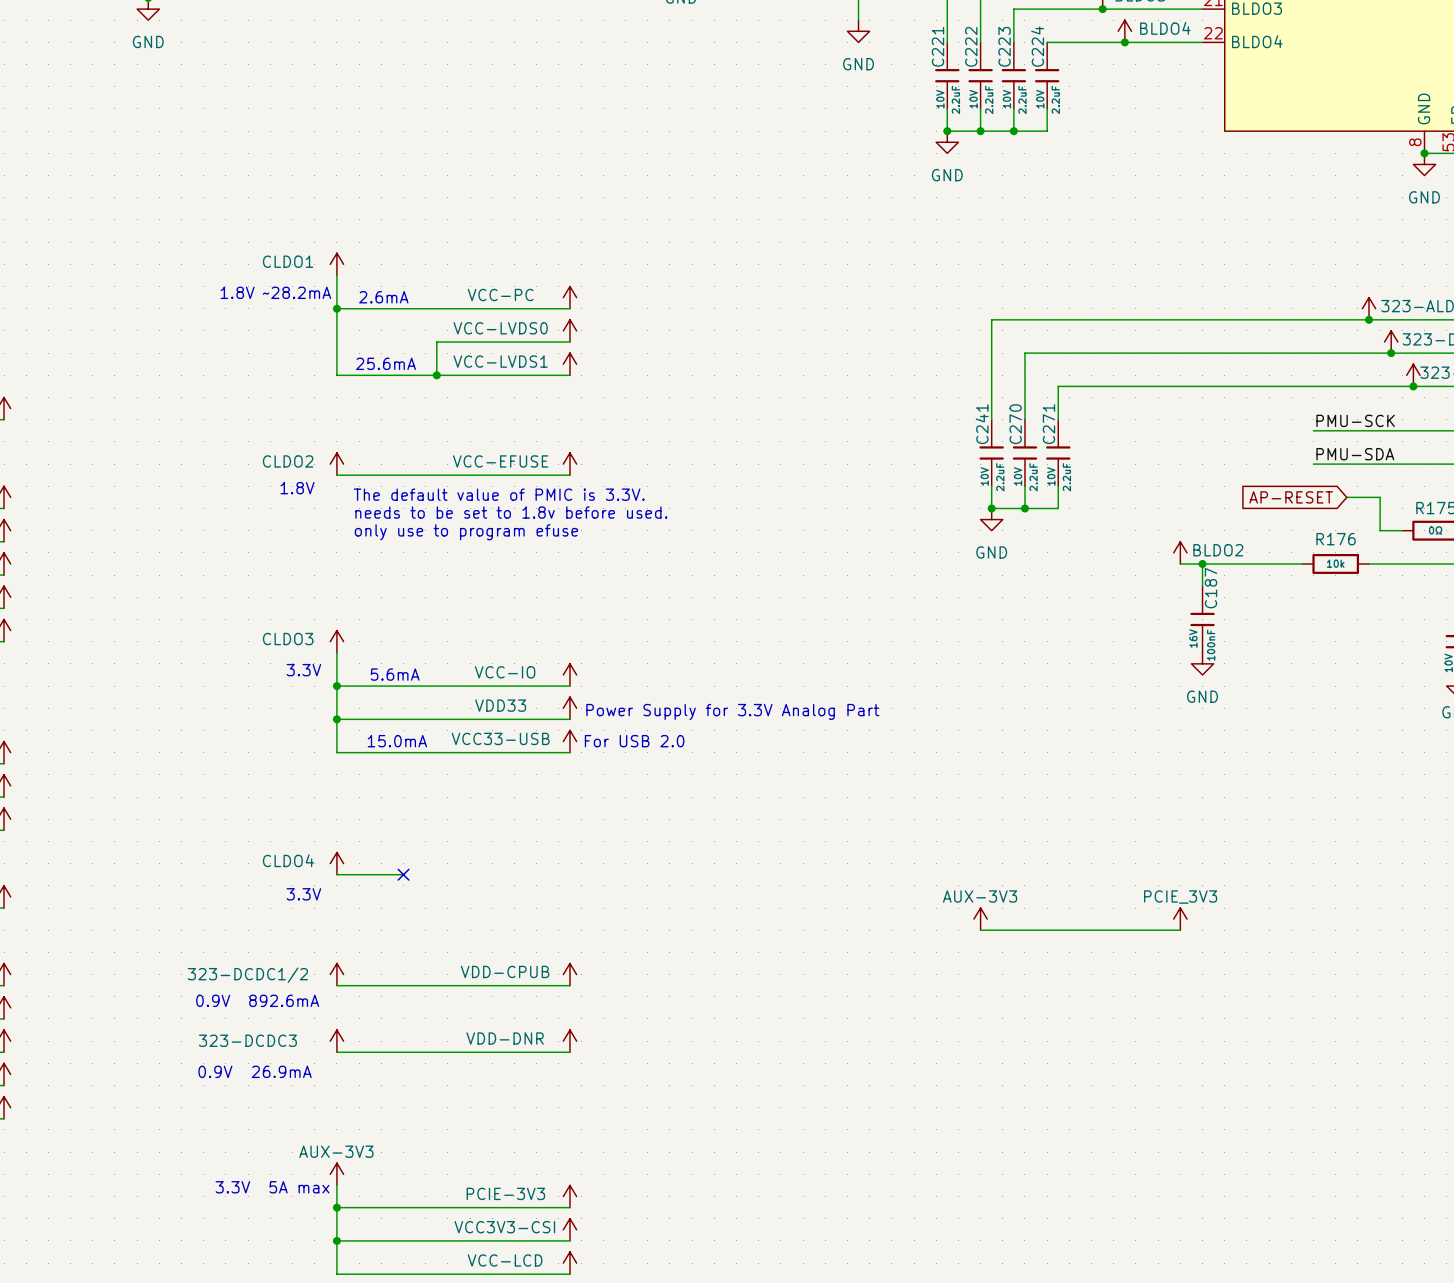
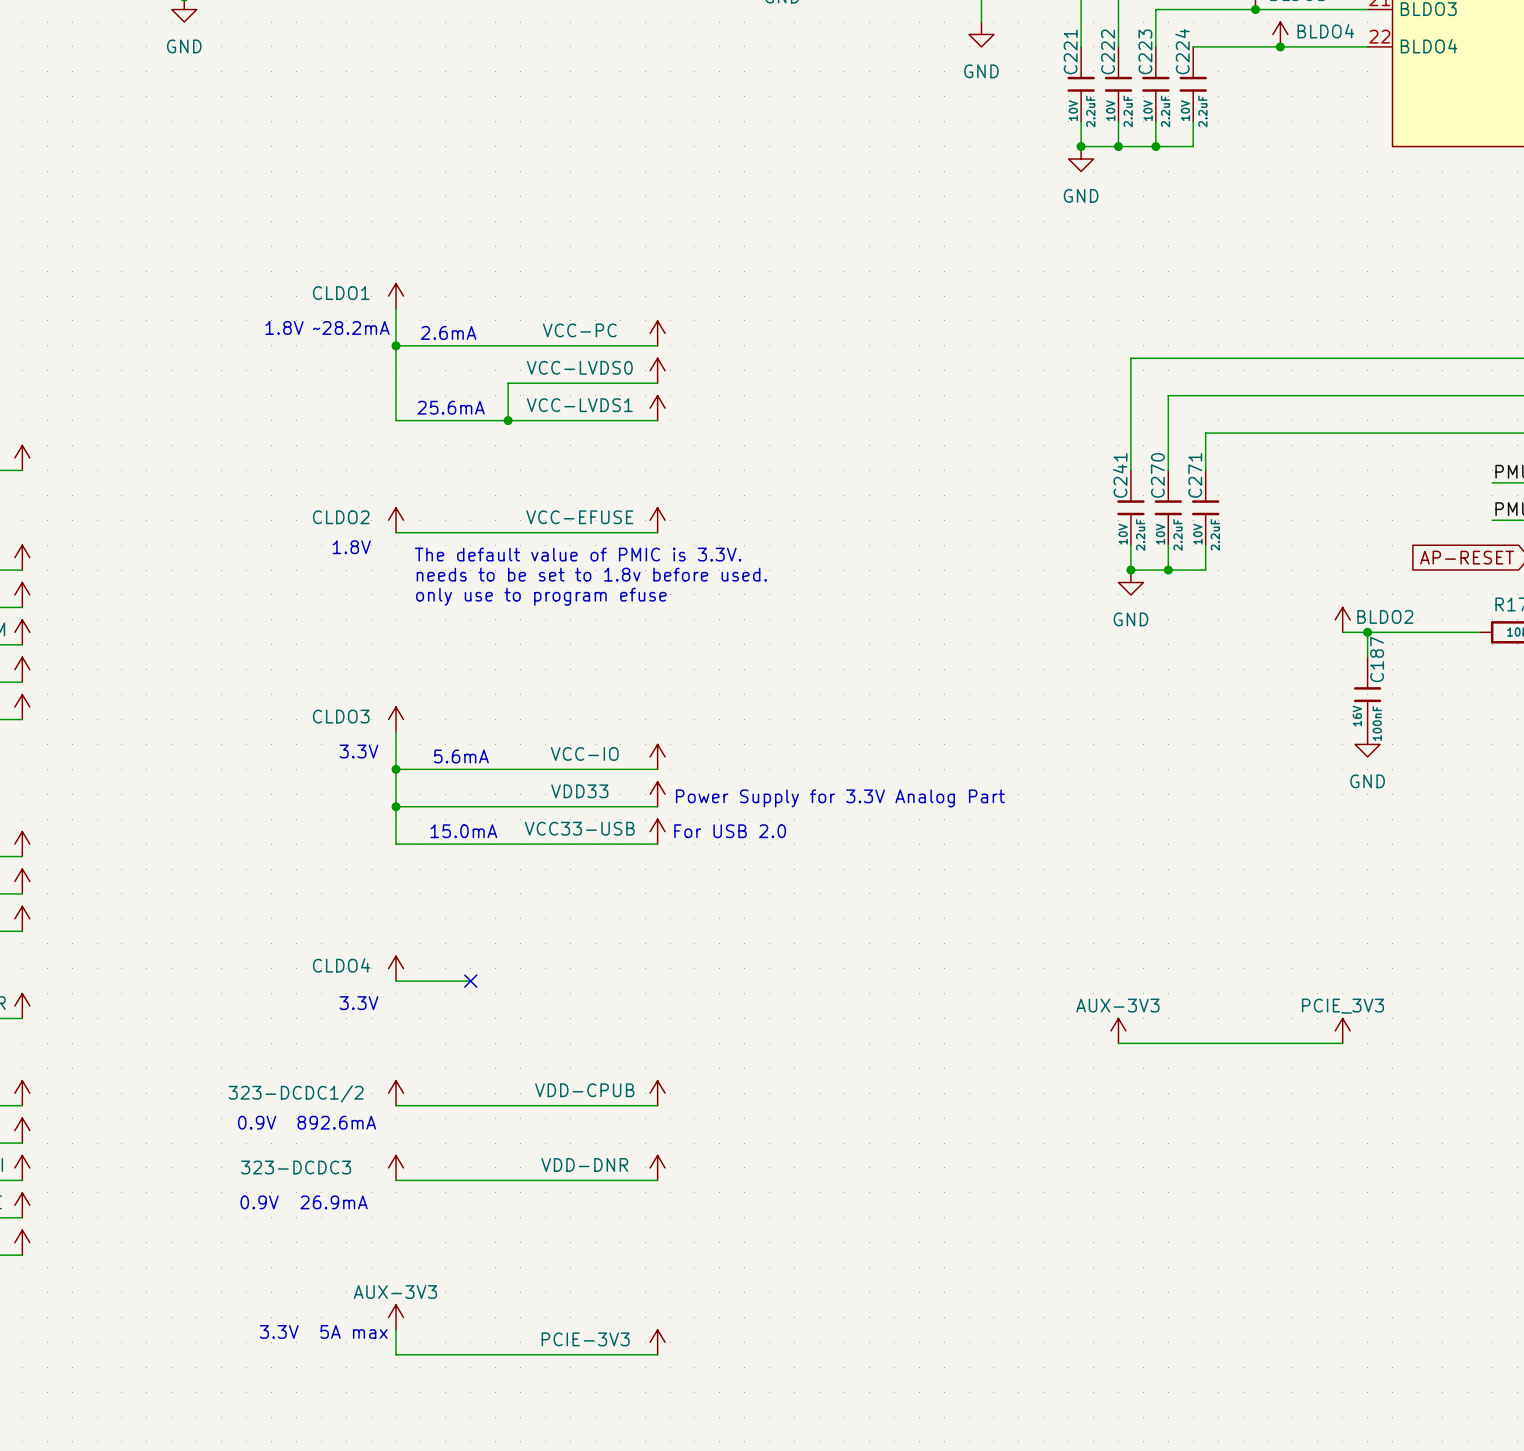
wire: (336, 1207) (336, 1274) (569, 1274) -> none
junction: (336, 1207) -> none
power symbol: VCC3V3-CSI (569, 1229) -> none
wire: (336, 1240) (569, 1240) -> none
junction: (336, 1240) -> none
power symbol: VCC-LCD (569, 1263) -> none

